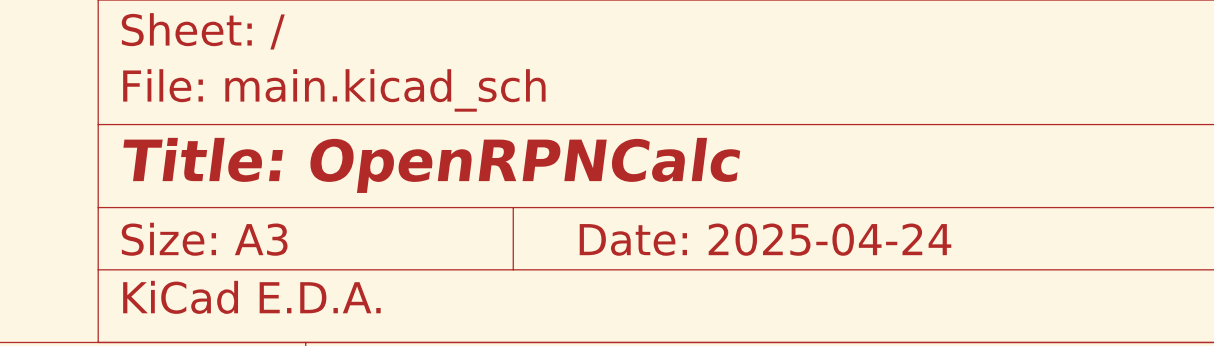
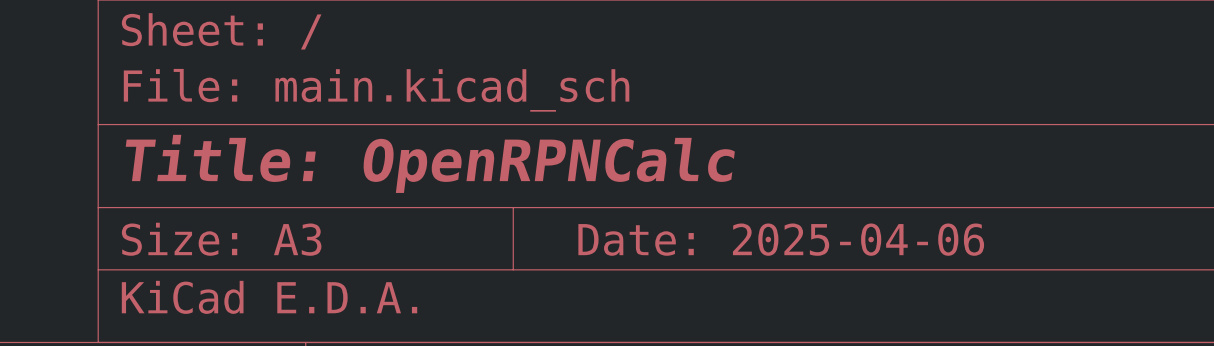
title block: Date: 2025-04-24 (765, 239) -> Date: 2025-04-06 (781, 239)

